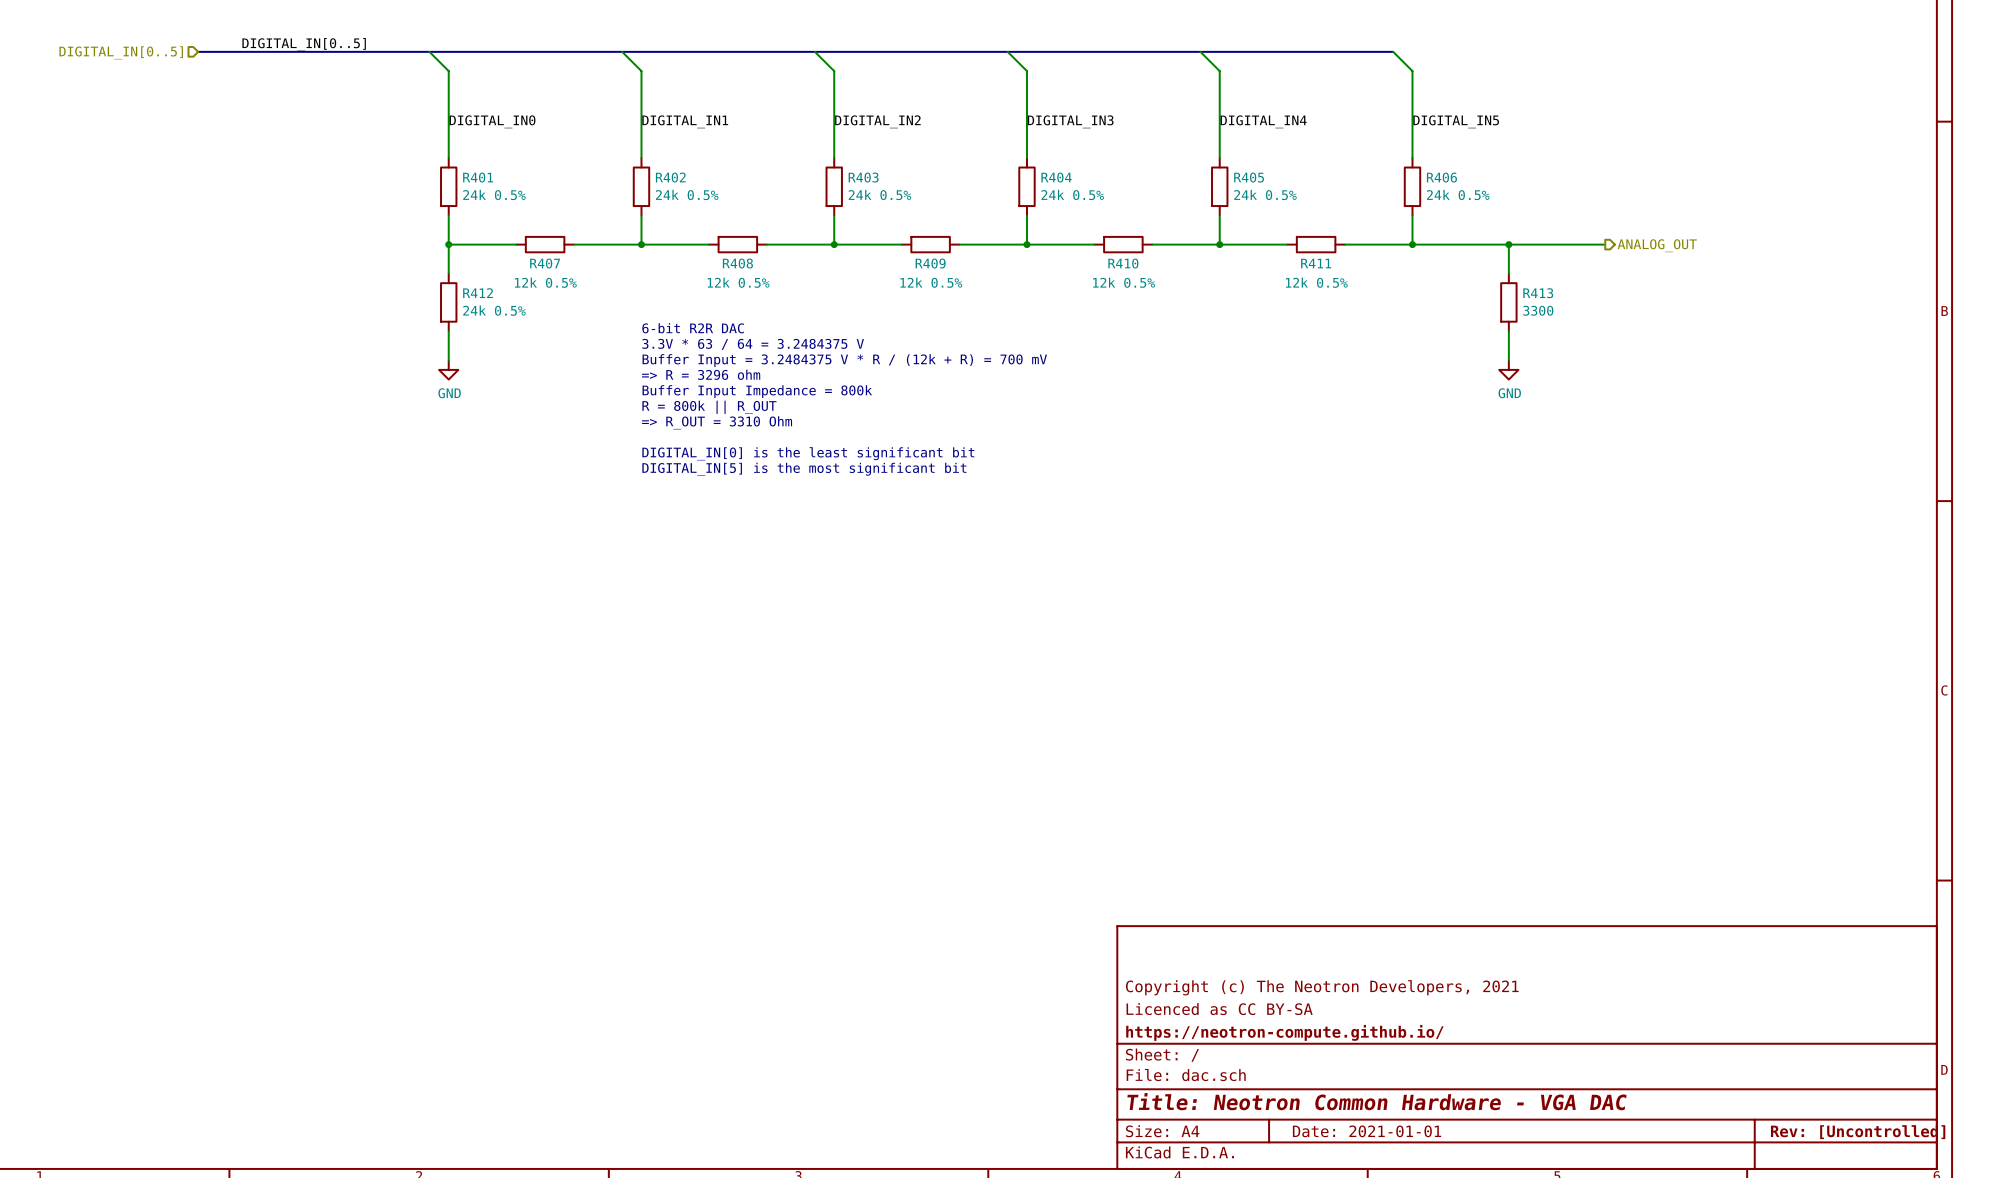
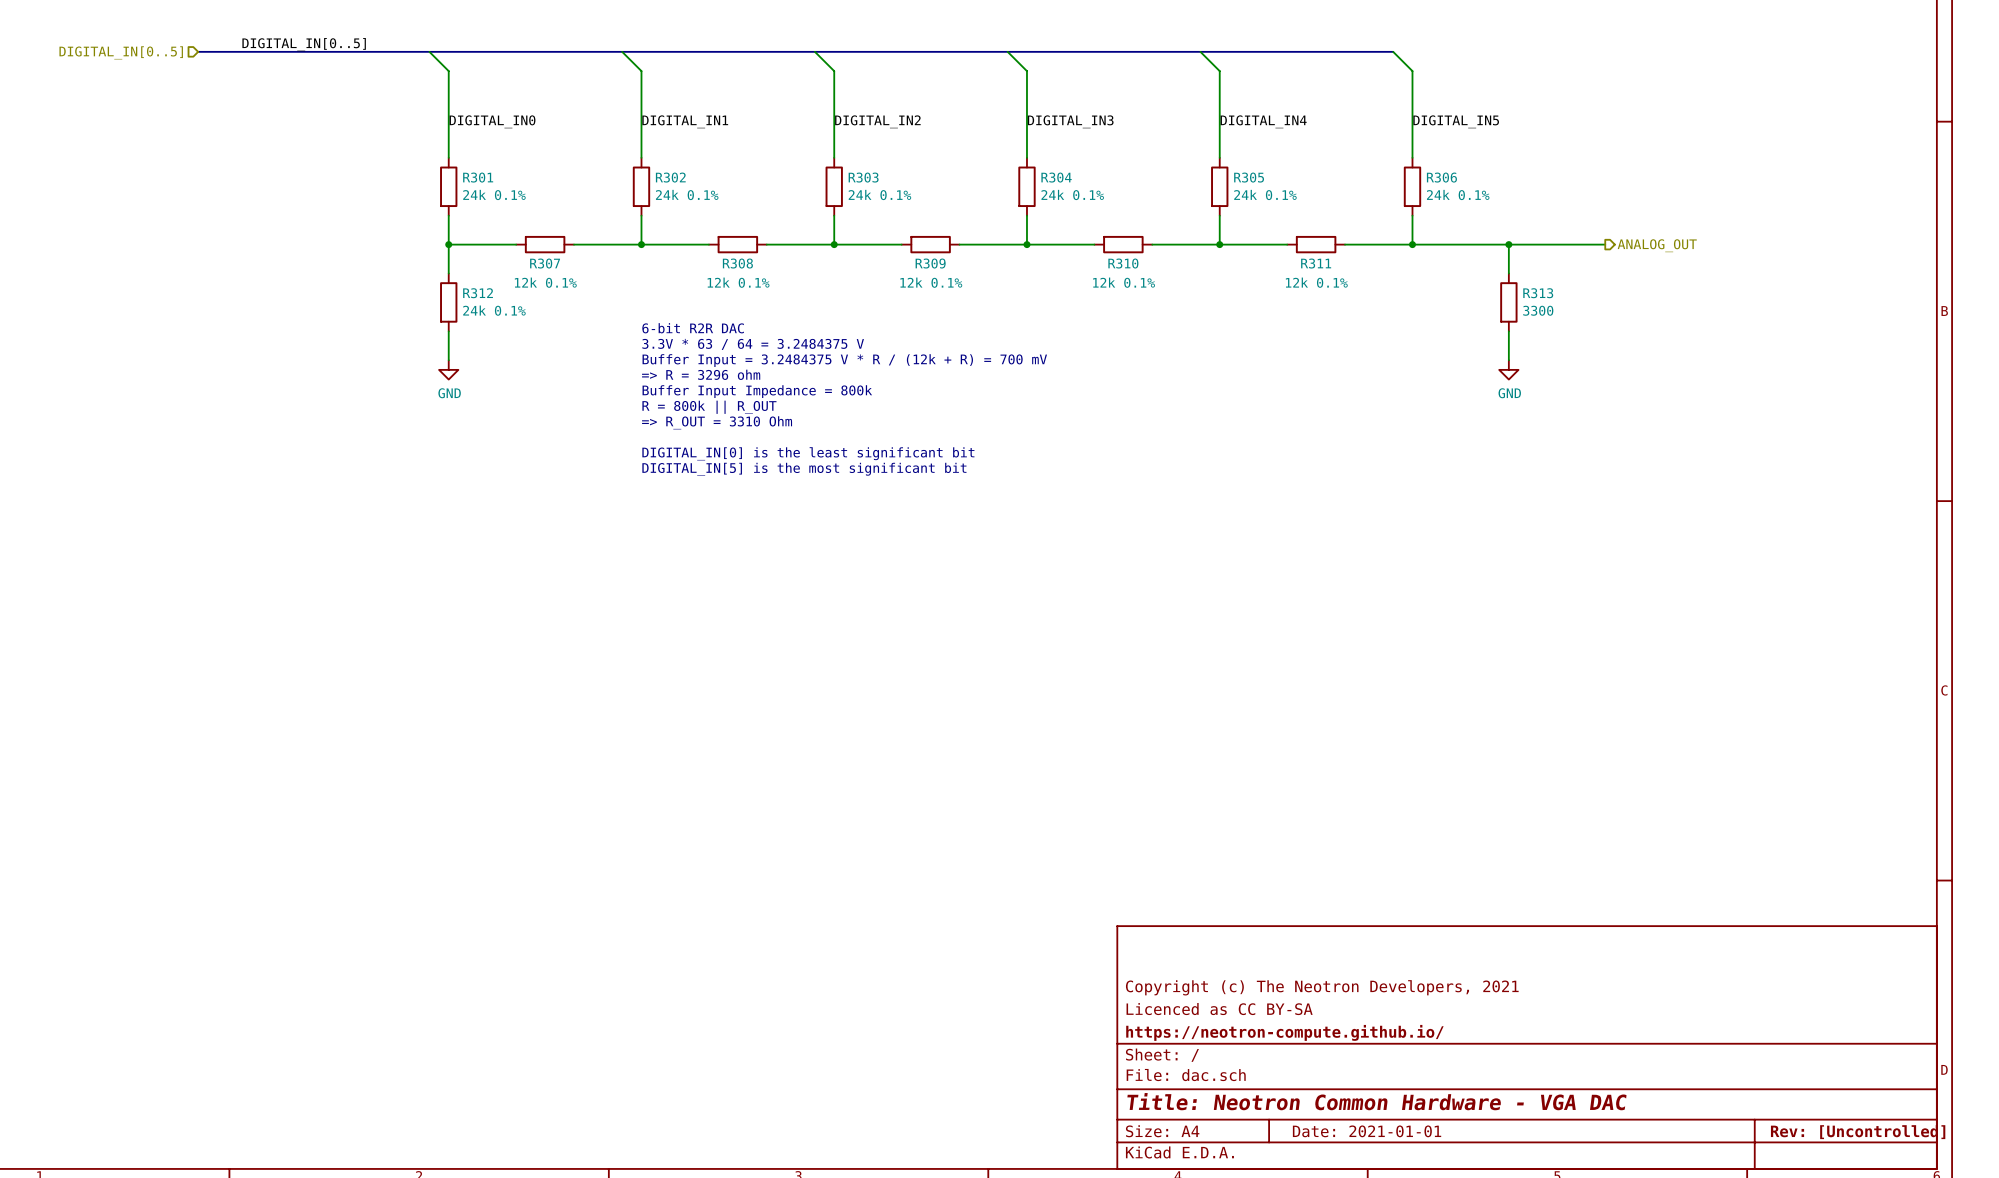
R401 name: R401 (478, 177) -> R301 (478, 177)
R402 name: R402 (670, 177) -> R302 (670, 177)
R403 name: R403 (863, 177) -> R303 (863, 177)
R404 name: R404 (1056, 177) -> R304 (1056, 177)
R405 name: R405 (1249, 177) -> R305 (1249, 177)
R406 name: R406 (1441, 177) -> R306 (1441, 177)
R401 value: 24k 0.5% (494, 194) -> 24k 0.1% (494, 194)
R402 value: 24k 0.5% (687, 194) -> 24k 0.1% (687, 194)
R403 value: 24k 0.5% (879, 194) -> 24k 0.1% (879, 194)
R404 value: 24k 0.5% (1072, 194) -> 24k 0.1% (1072, 194)
R405 value: 24k 0.5% (1265, 194) -> 24k 0.1% (1265, 194)
R406 value: 24k 0.5% (1458, 194) -> 24k 0.1% (1458, 194)
R407 name: R407 (545, 263) -> R307 (545, 263)
R408 name: R408 (737, 263) -> R308 (737, 263)
R409 name: R409 (930, 263) -> R309 (930, 263)
R410 name: R410 (1123, 263) -> R310 (1123, 263)
R411 name: R411 (1316, 263) -> R311 (1316, 263)
R407 value: 12k 0.5% (545, 282) -> 12k 0.1% (545, 282)
R408 value: 12k 0.5% (738, 282) -> 12k 0.1% (738, 282)
R409 value: 12k 0.5% (931, 282) -> 12k 0.1% (931, 282)
R410 value: 12k 0.5% (1124, 282) -> 12k 0.1% (1124, 282)
R411 value: 12k 0.5% (1316, 282) -> 12k 0.1% (1316, 282)
R412 name: R412 (478, 293) -> R312 (478, 293)
R413 name: R413 (1538, 293) -> R313 (1538, 293)
R412 value: 24k 0.5% (494, 310) -> 24k 0.1% (494, 310)

